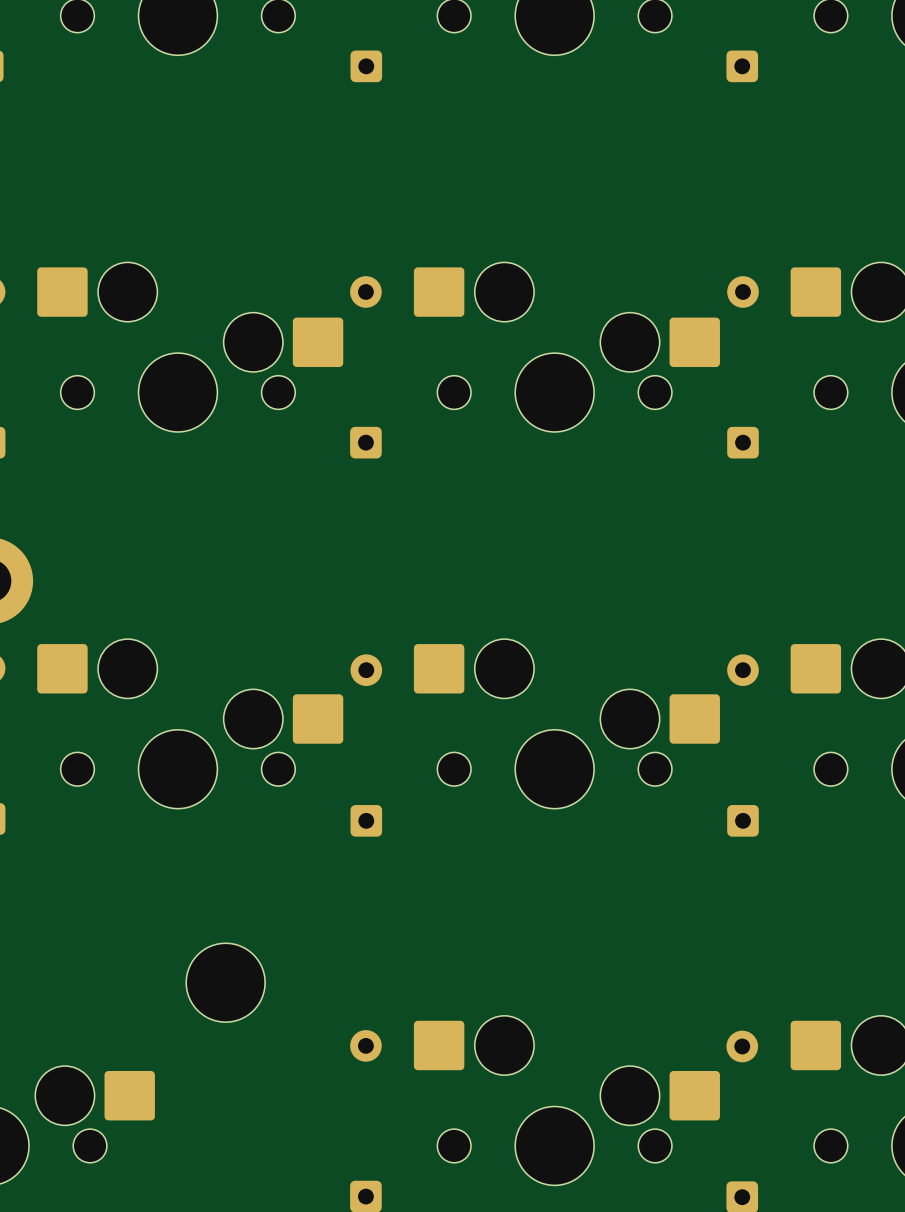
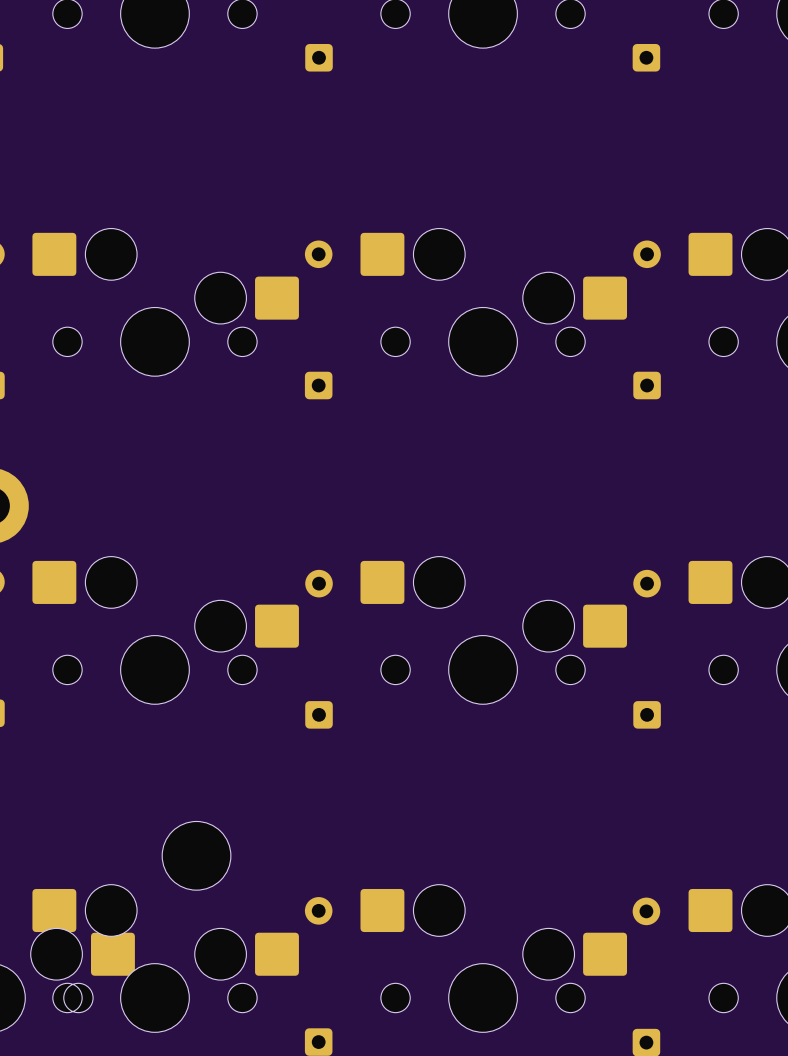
part: none -> (165, 958)

